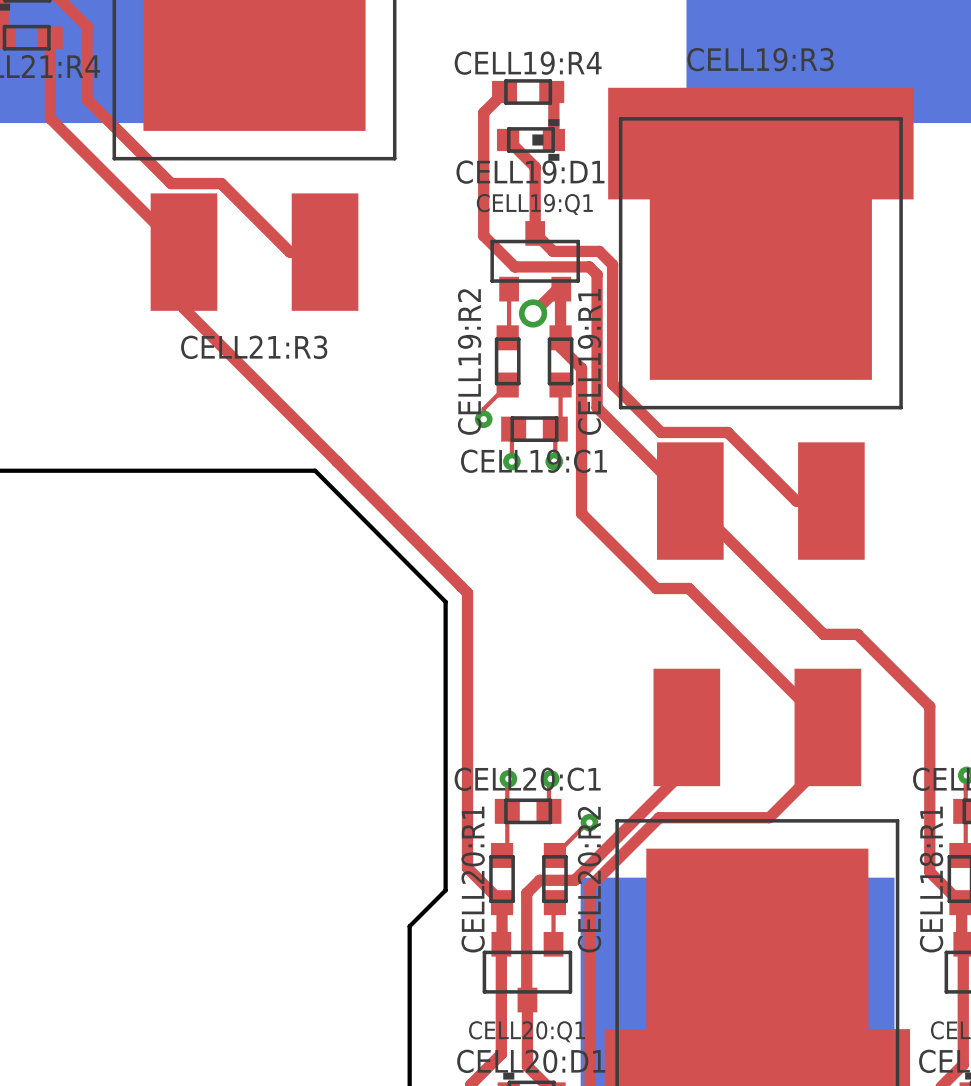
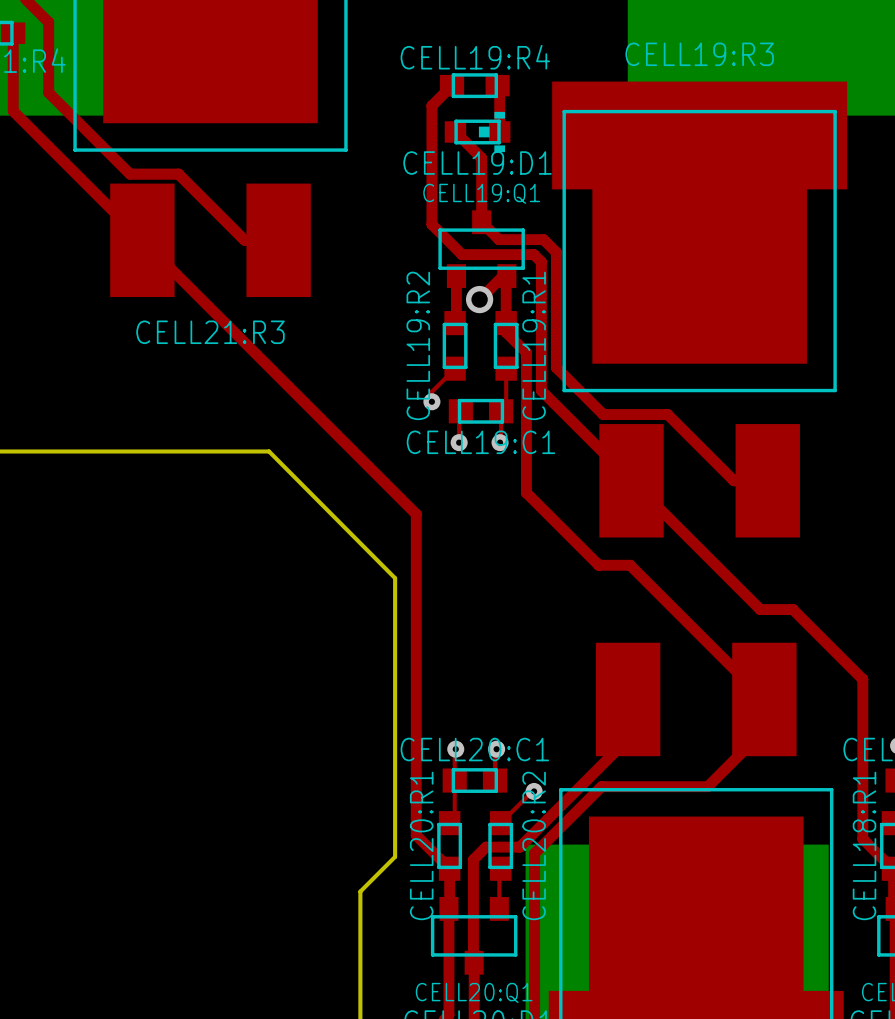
top track: (183, 252) (183, 308) (467, 592) -> (142, 240) (416, 514) (416, 569)
top track width: thin (509, 289) (507, 337) -> thick (456, 276) (455, 323)

